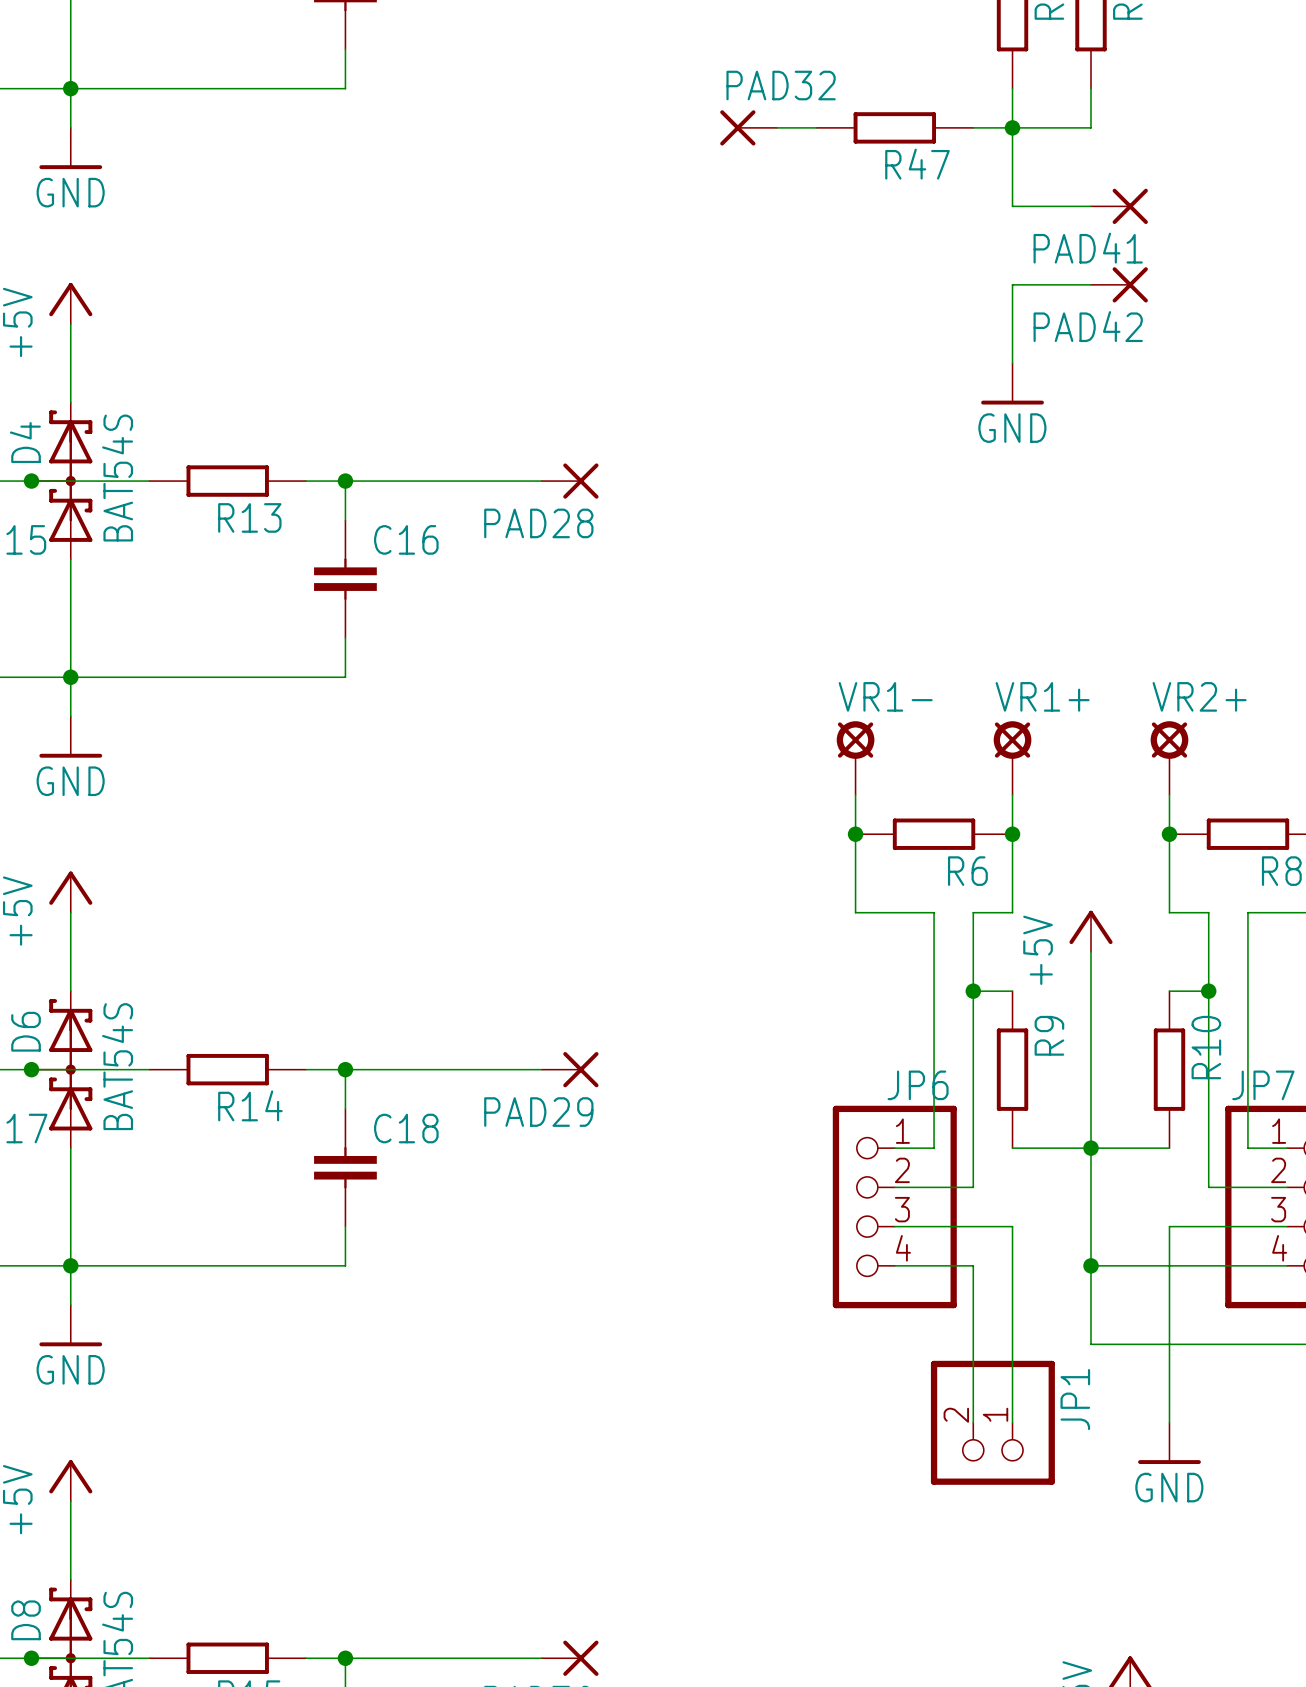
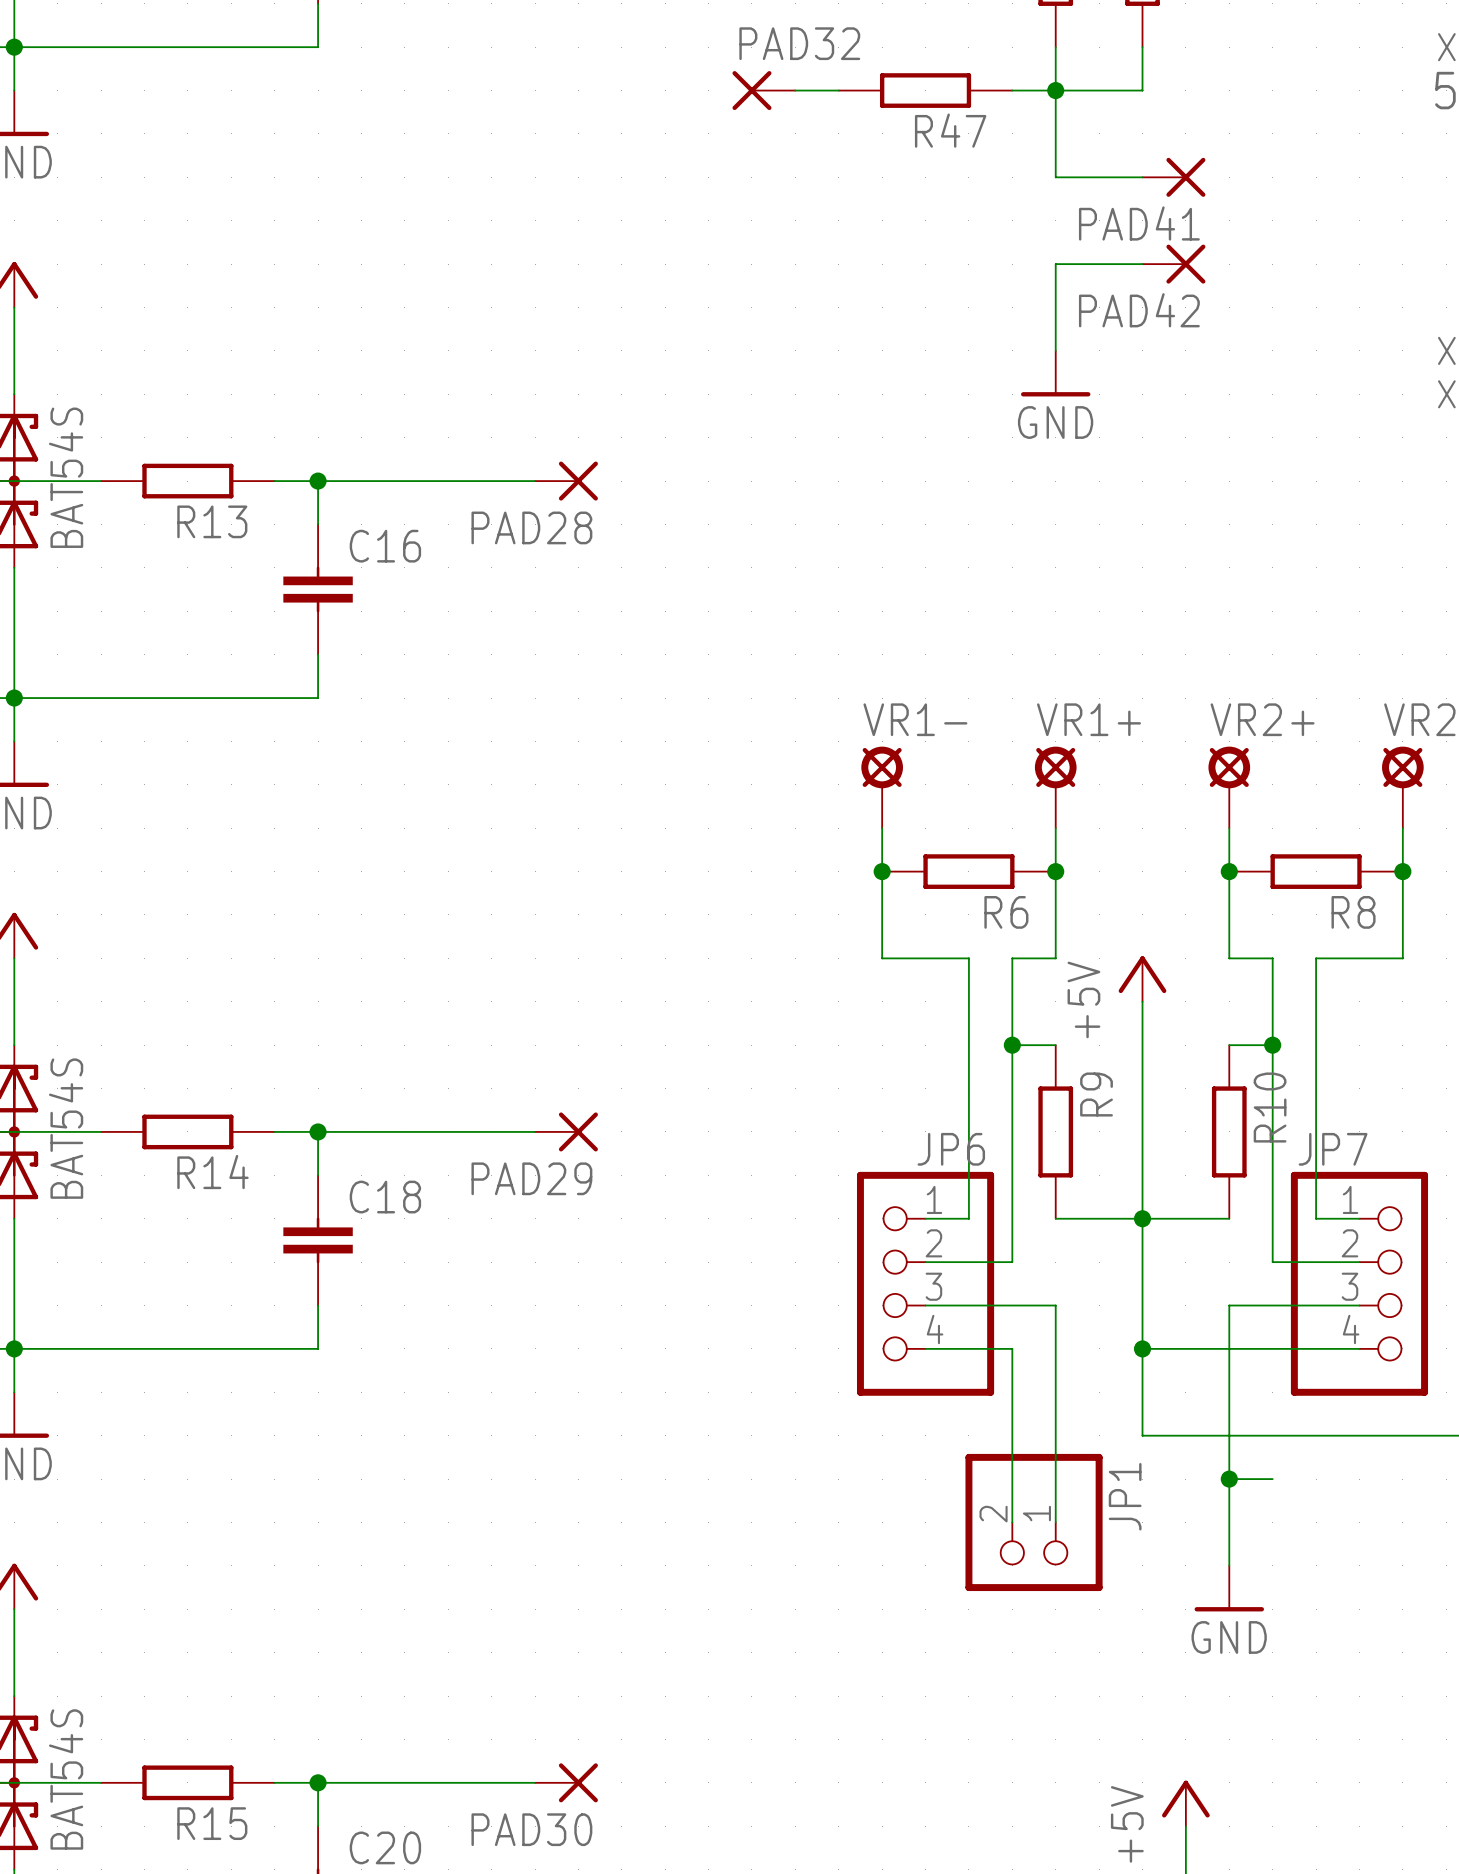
wire: none -> (1229, 1479) (1272, 1479)
junction: none -> (1229, 1479)
power symbol position: GND (1169, 1443) -> GND (1229, 1588)

